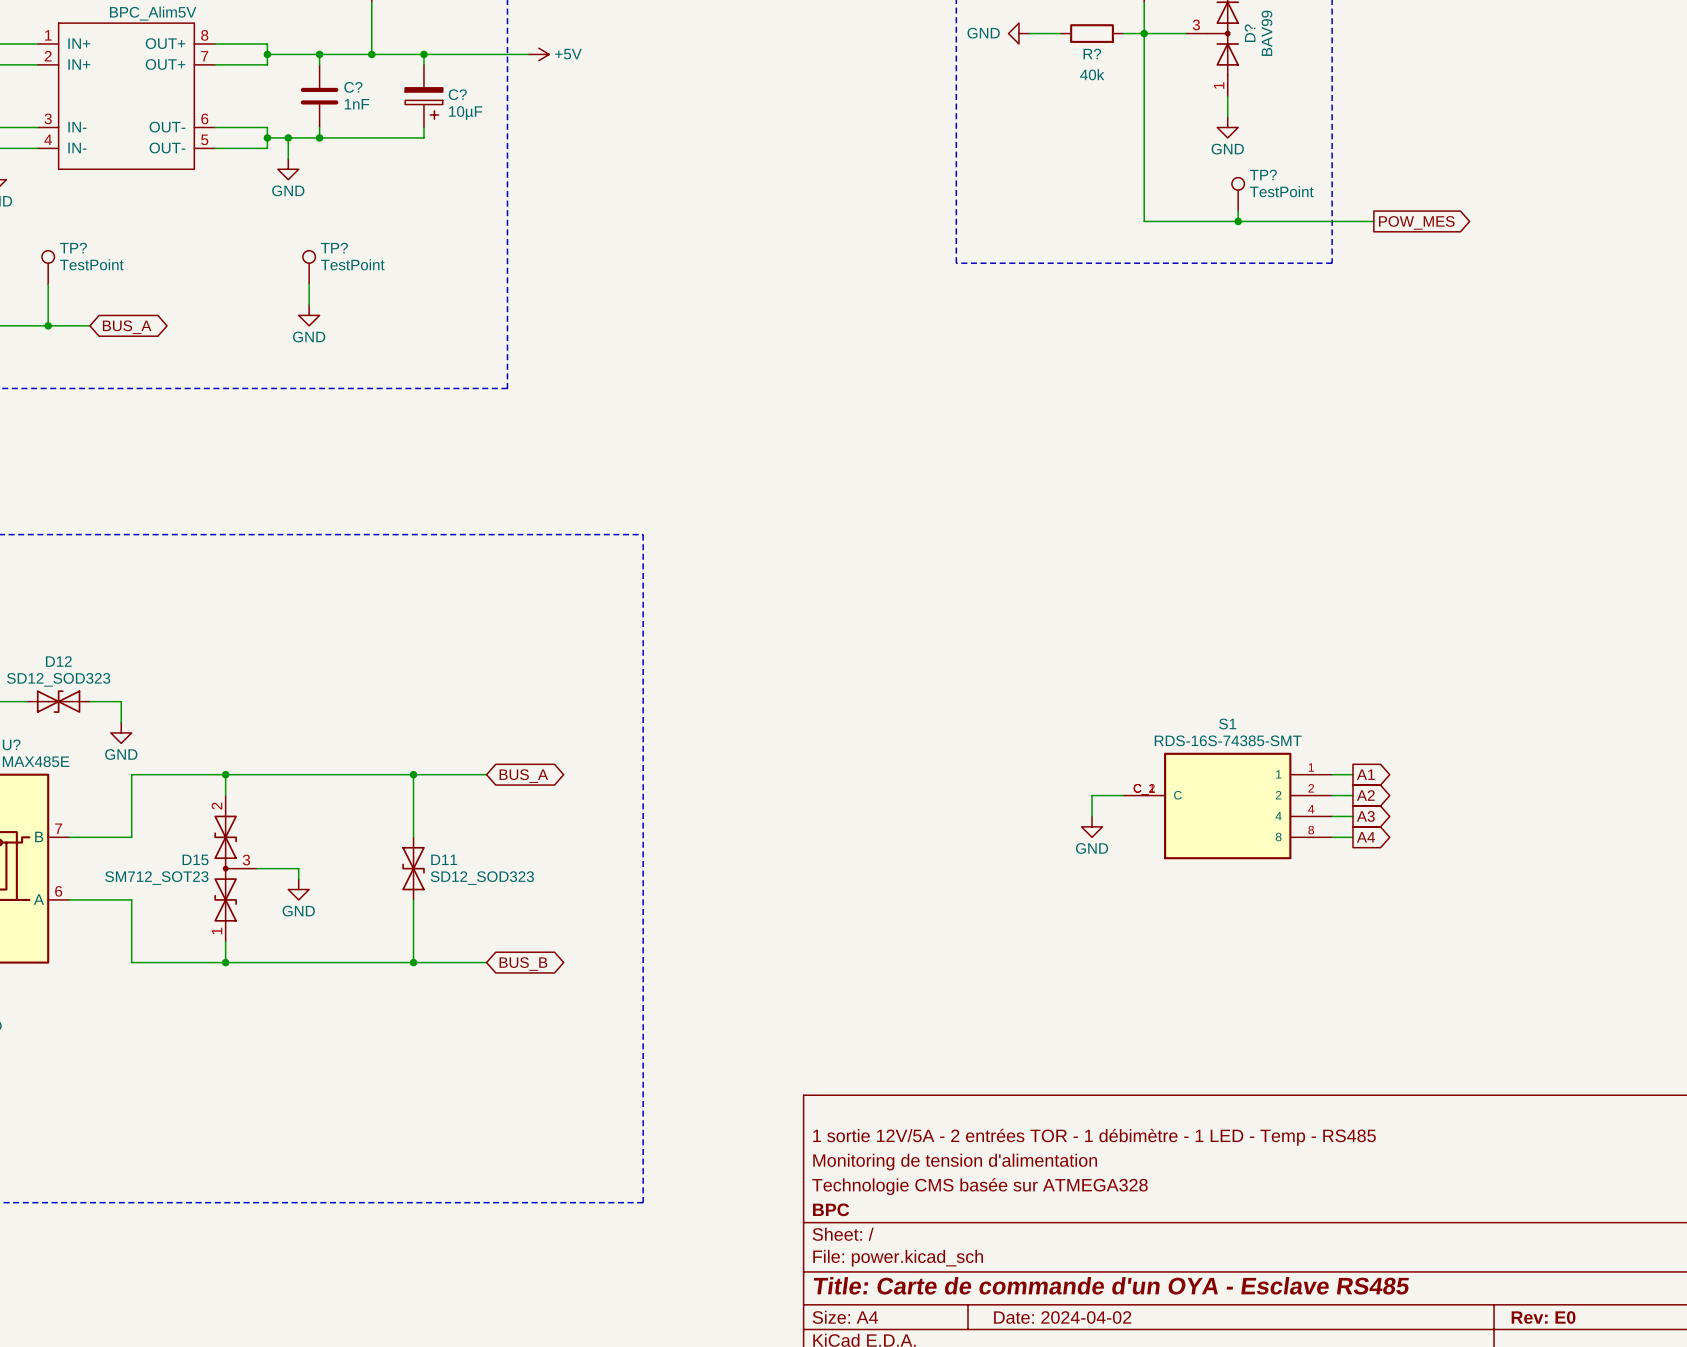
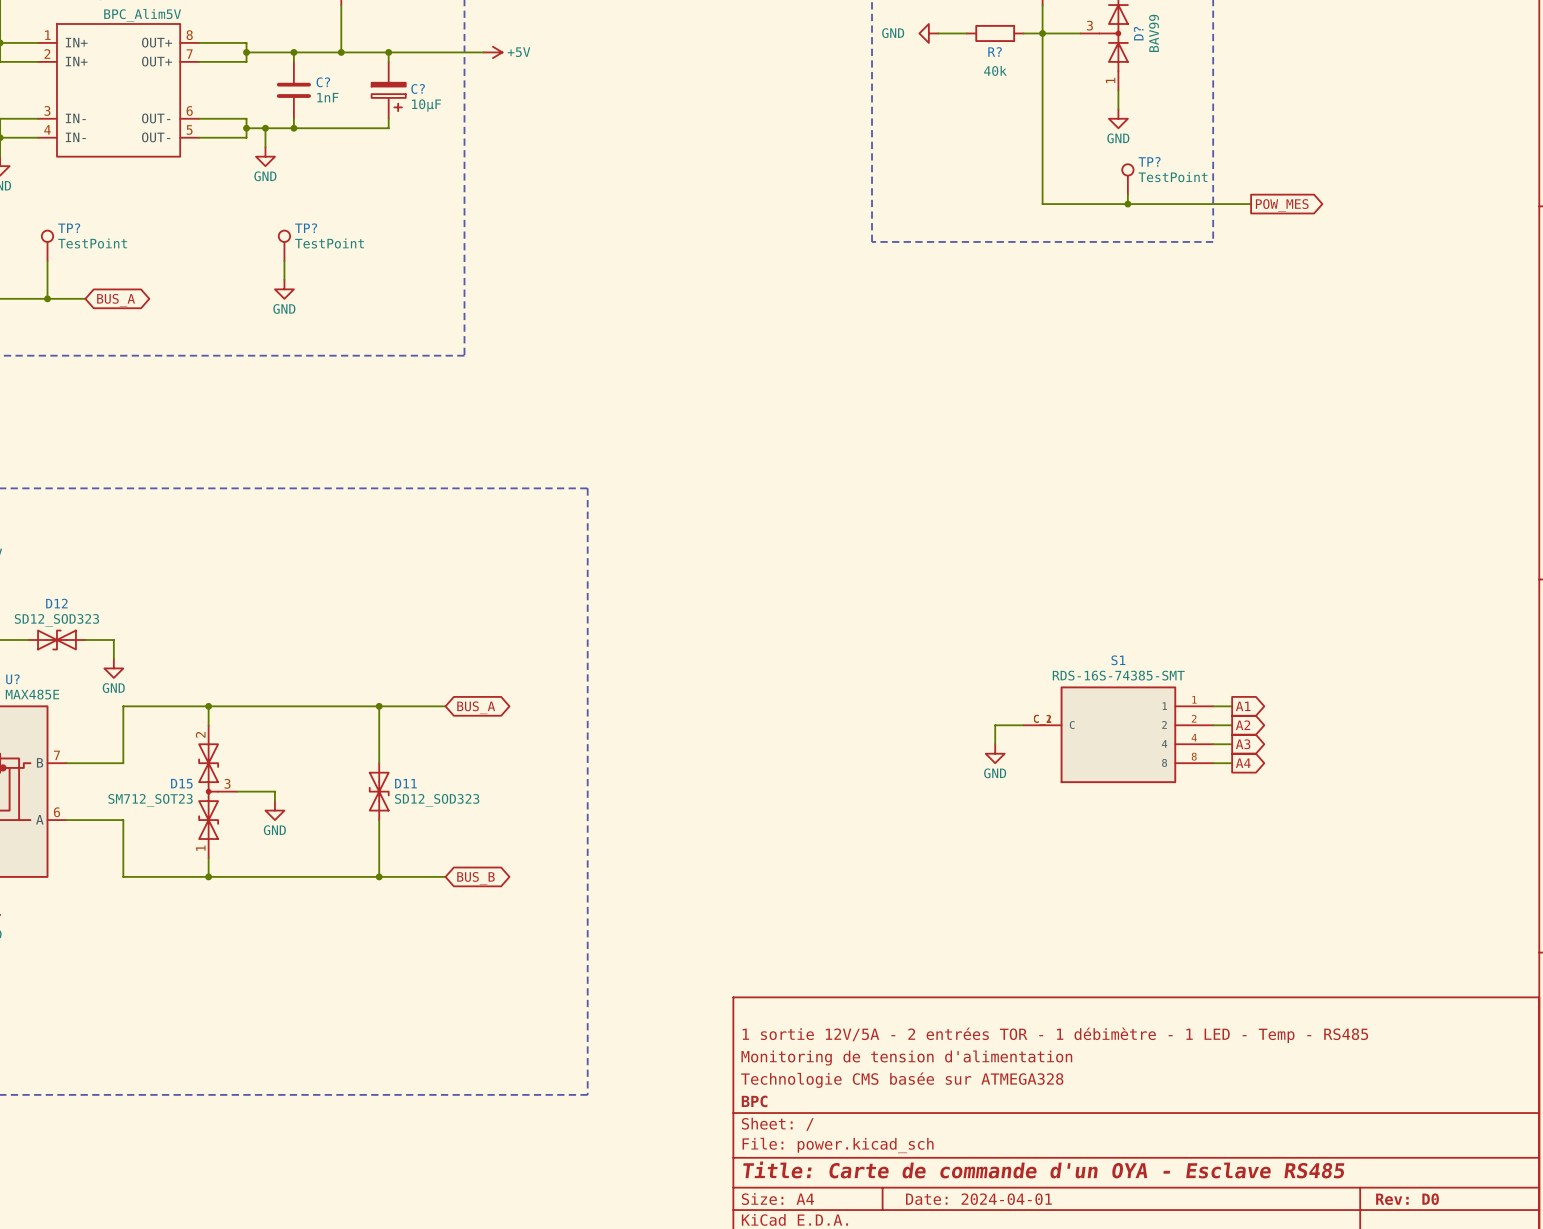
title block: Date: 2024-04-02 (1062, 1317) -> Date: 2024-04-01 (978, 1199)
title block: Rev: E0 (1543, 1317) -> Rev: D0 (1407, 1199)

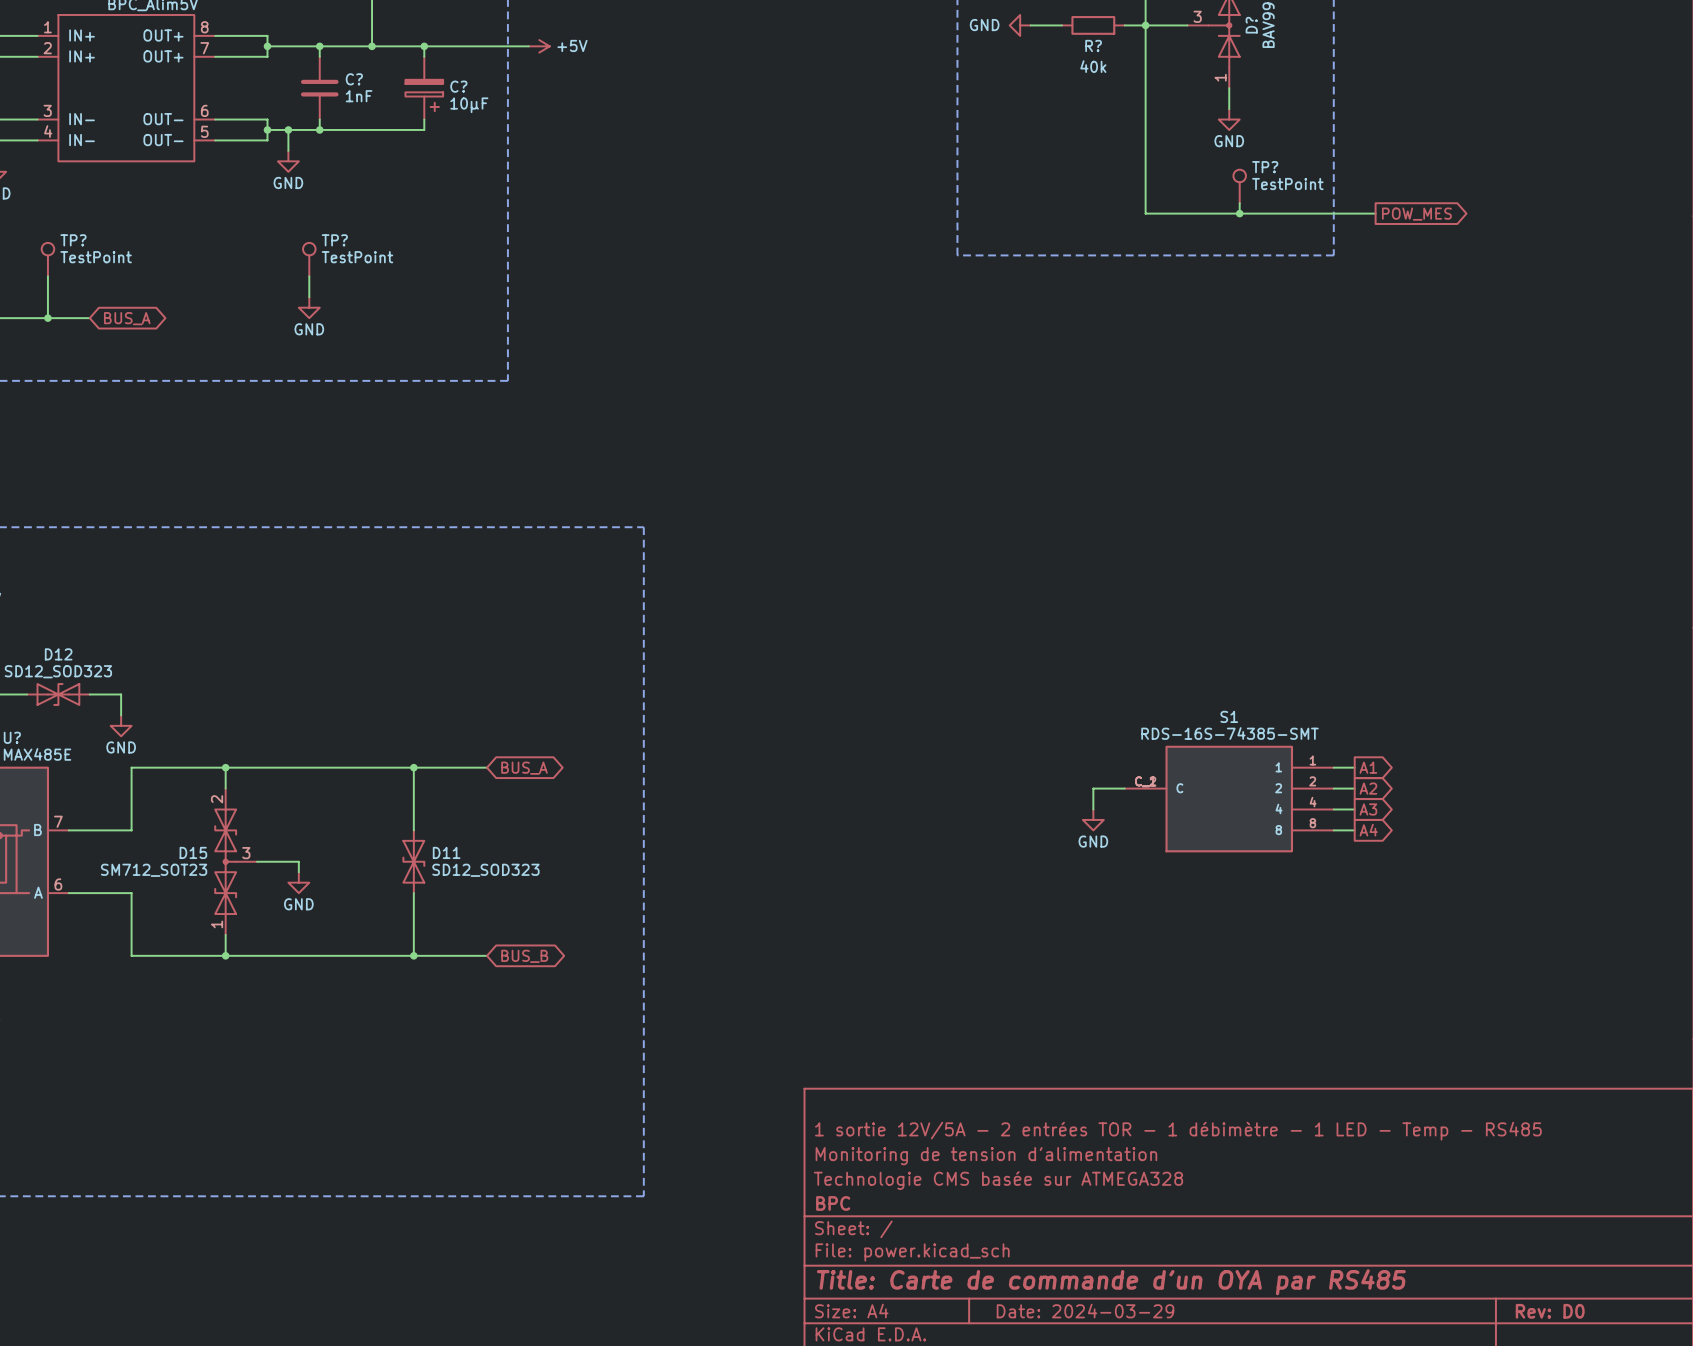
title block: Title: Carte de commande d'un OYA - Esclave RS485 (1043, 1169) -> Title: Carte de commande d'un OYA par RS485 (1111, 1282)
title block: Date: 2024-04-01 (978, 1199) -> Date: 2024-03-29 (1085, 1311)

